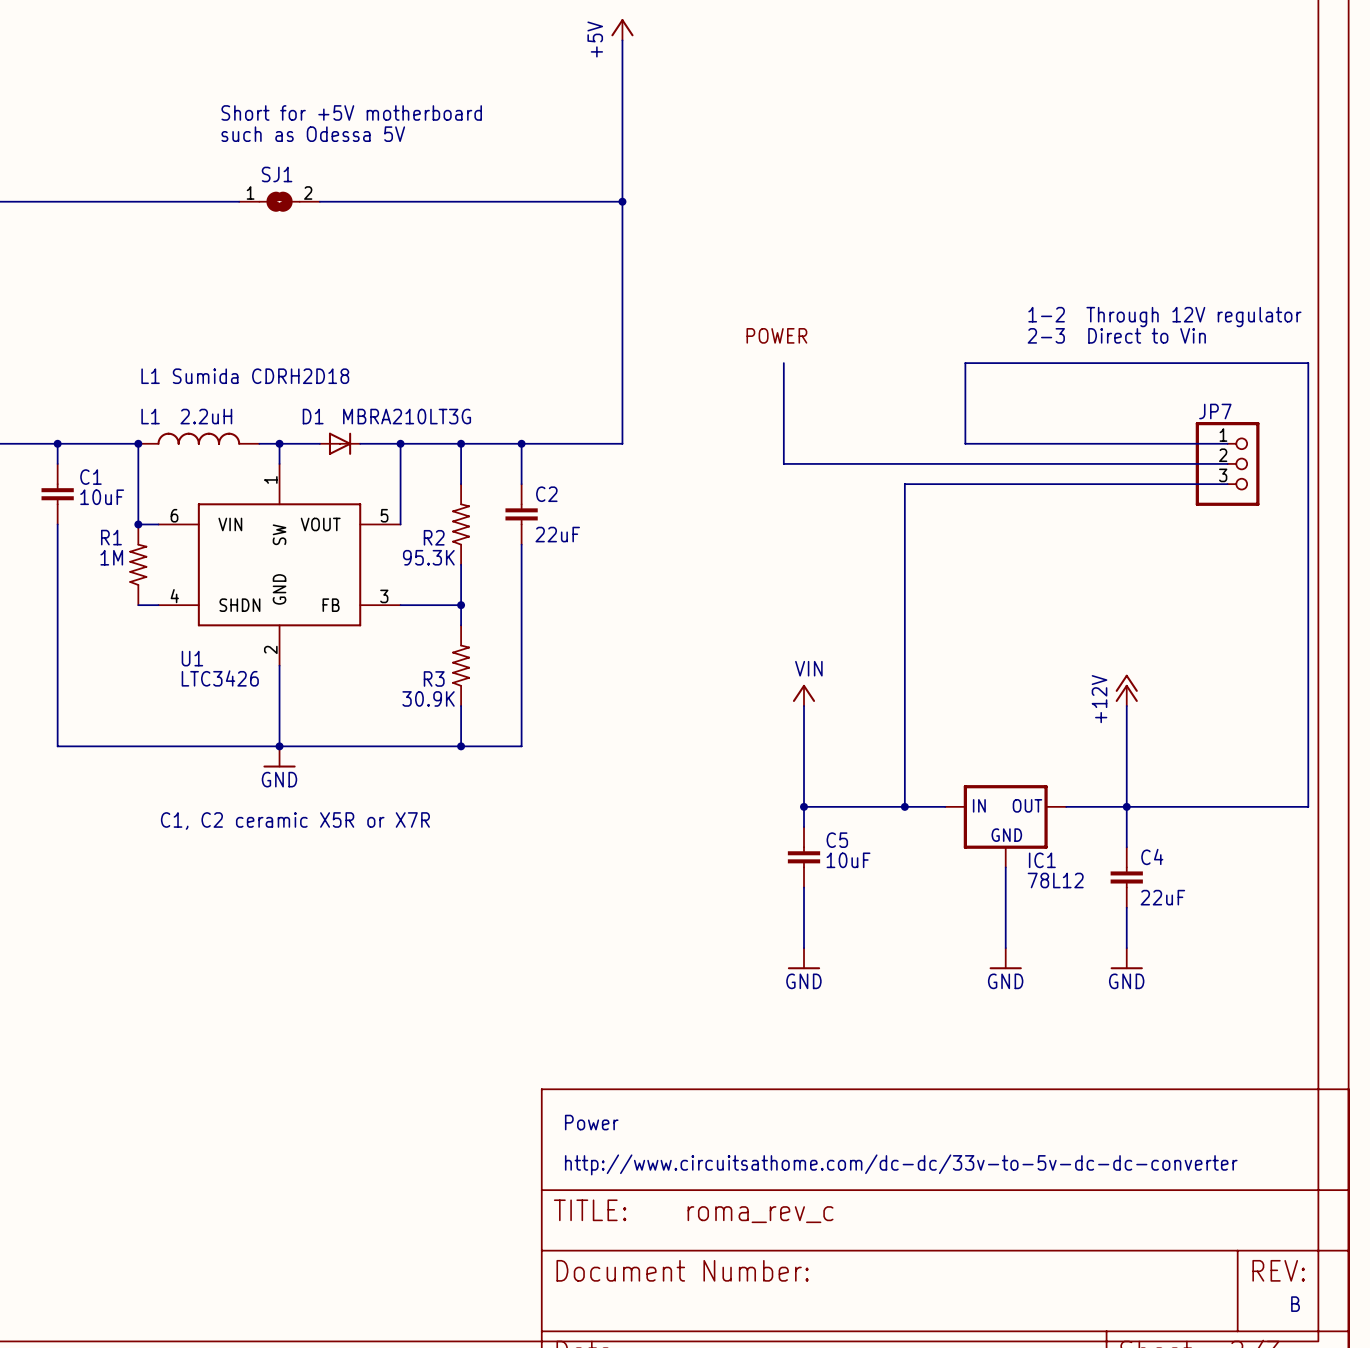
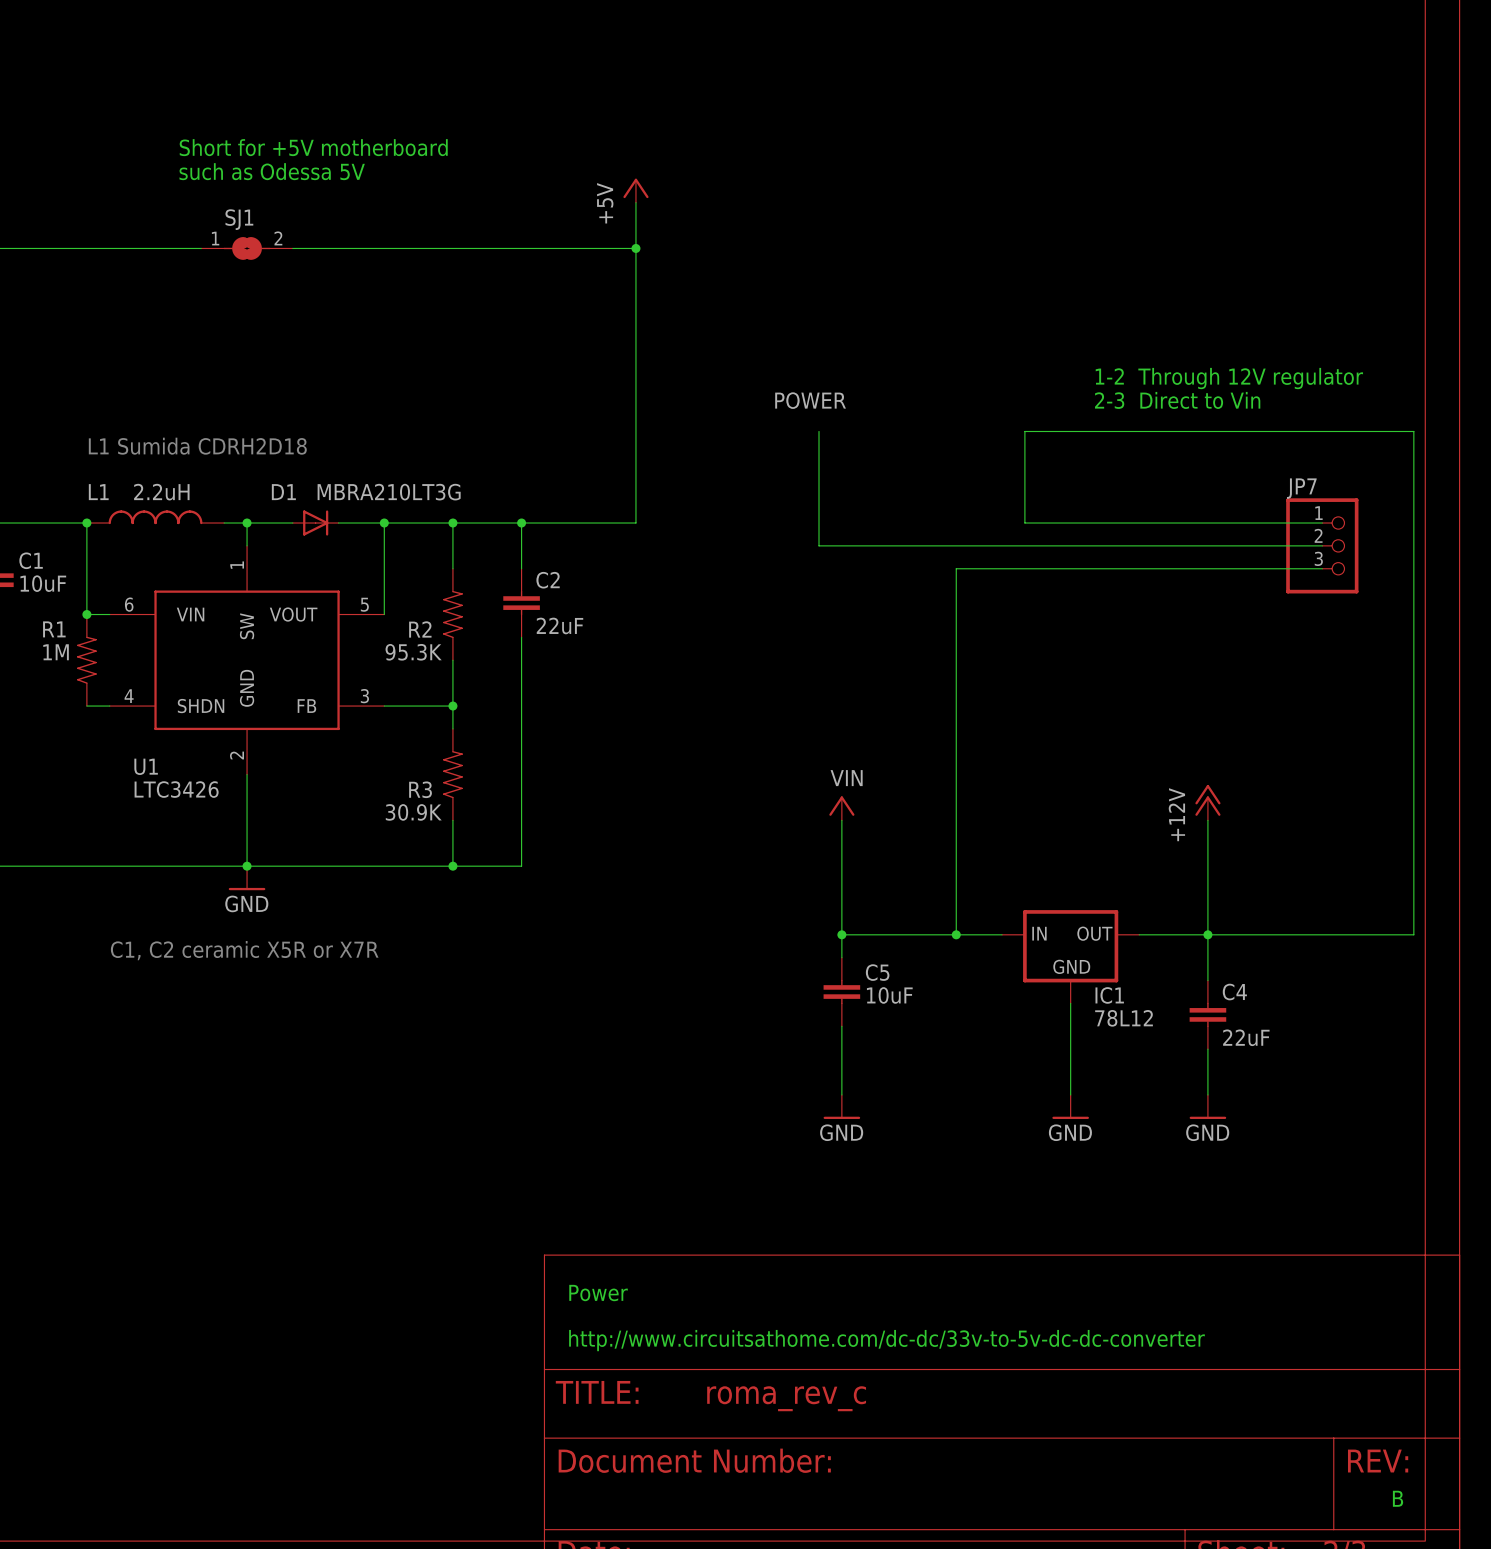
power symbol position: +5V (622, 29) -> +5V (635, 190)
wire: (622, 40) (622, 161) -> none

